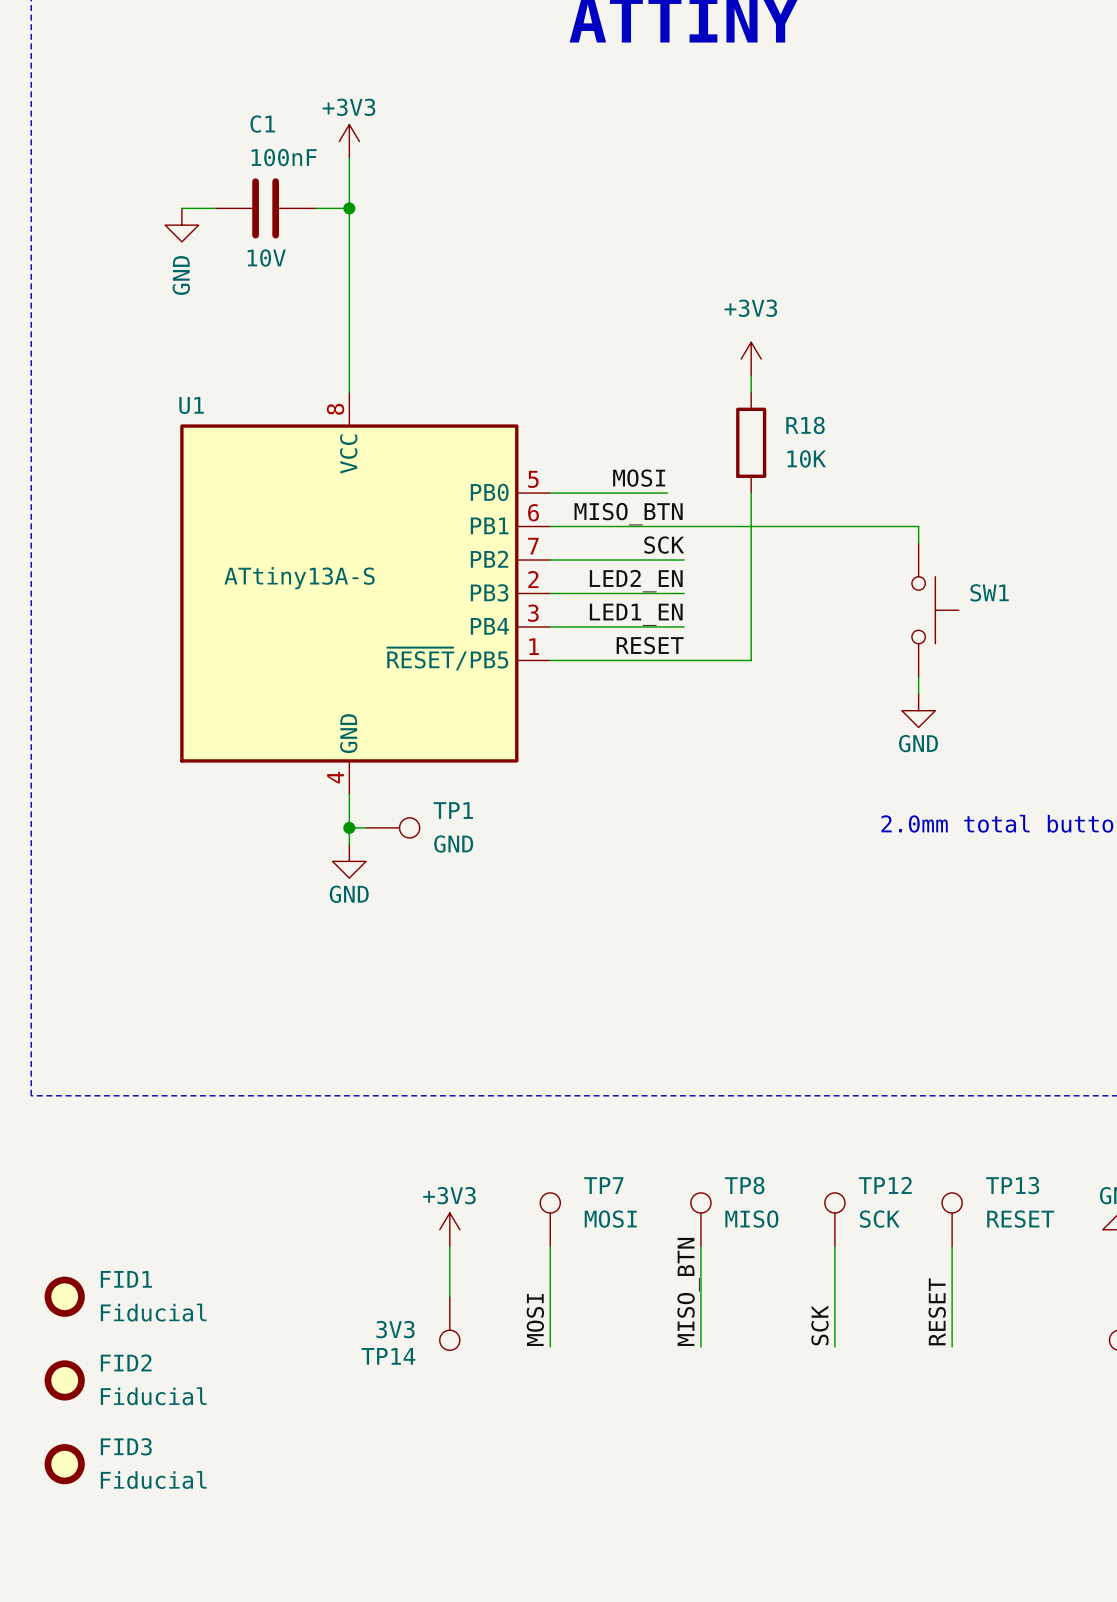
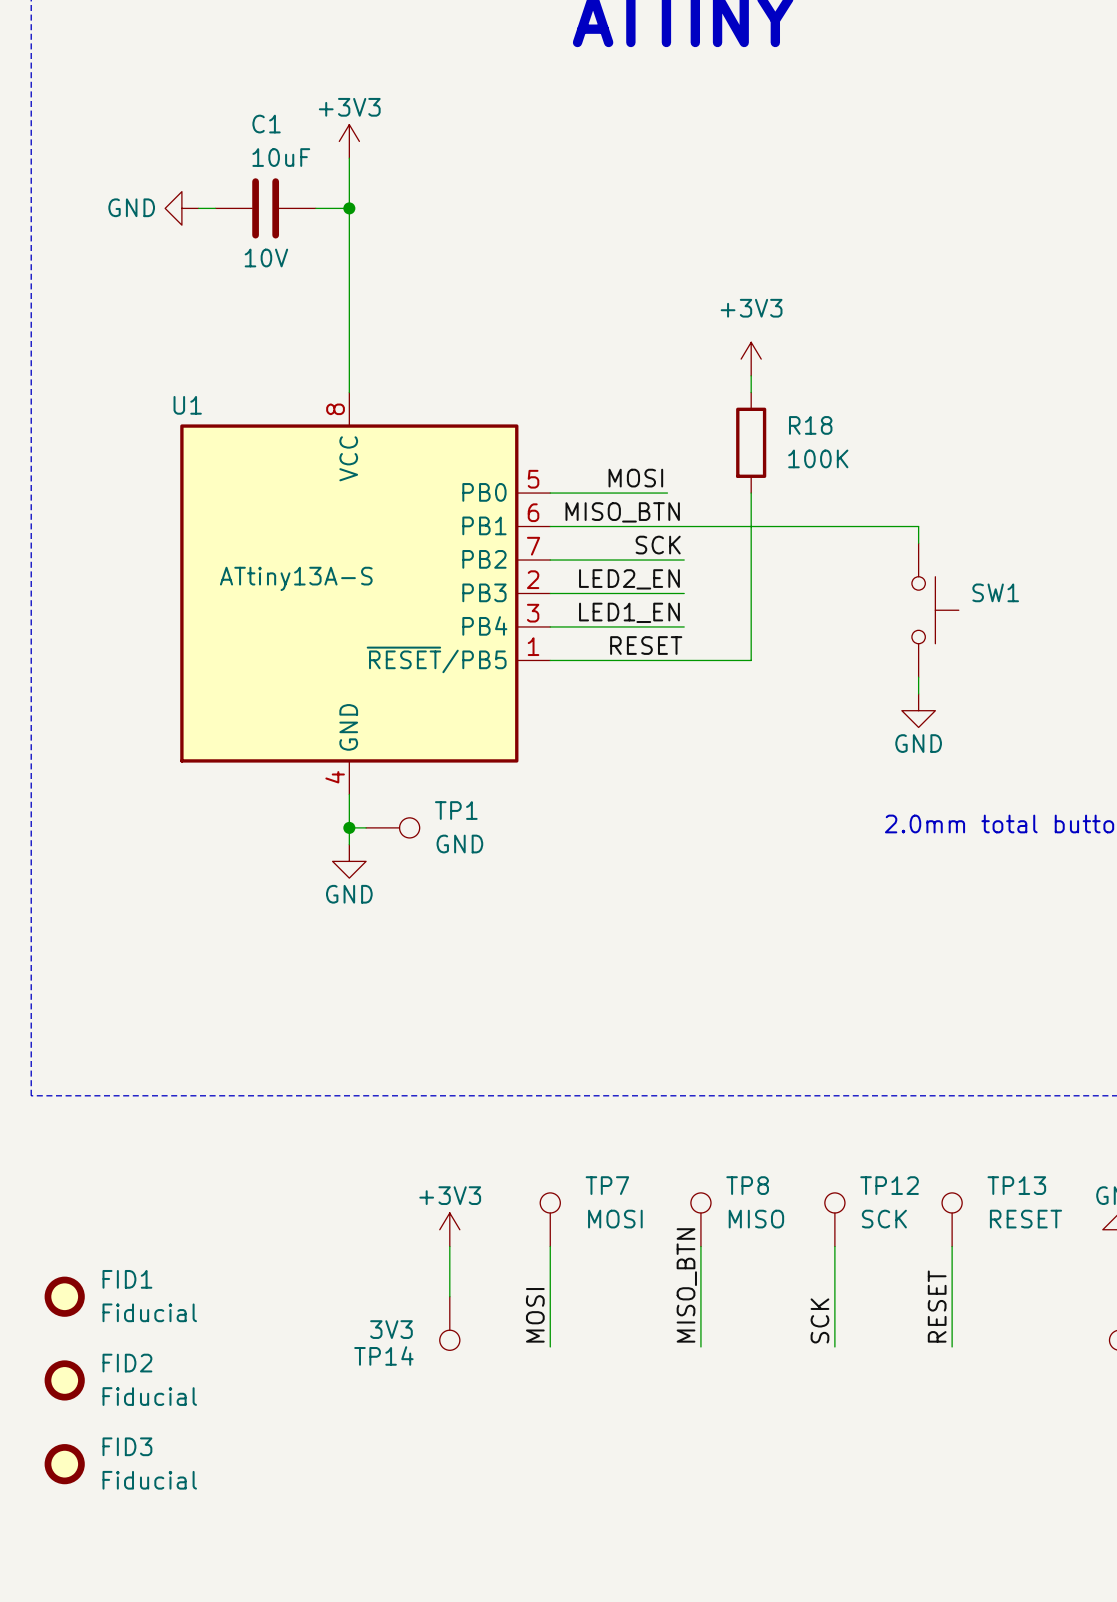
C1 value: 100nF (284, 157) -> 10uF (281, 157)
power symbol rotation: 0° (181, 225) -> 90° clockwise (181, 208)
R18 value: 10K (806, 458) -> 100K (818, 458)

